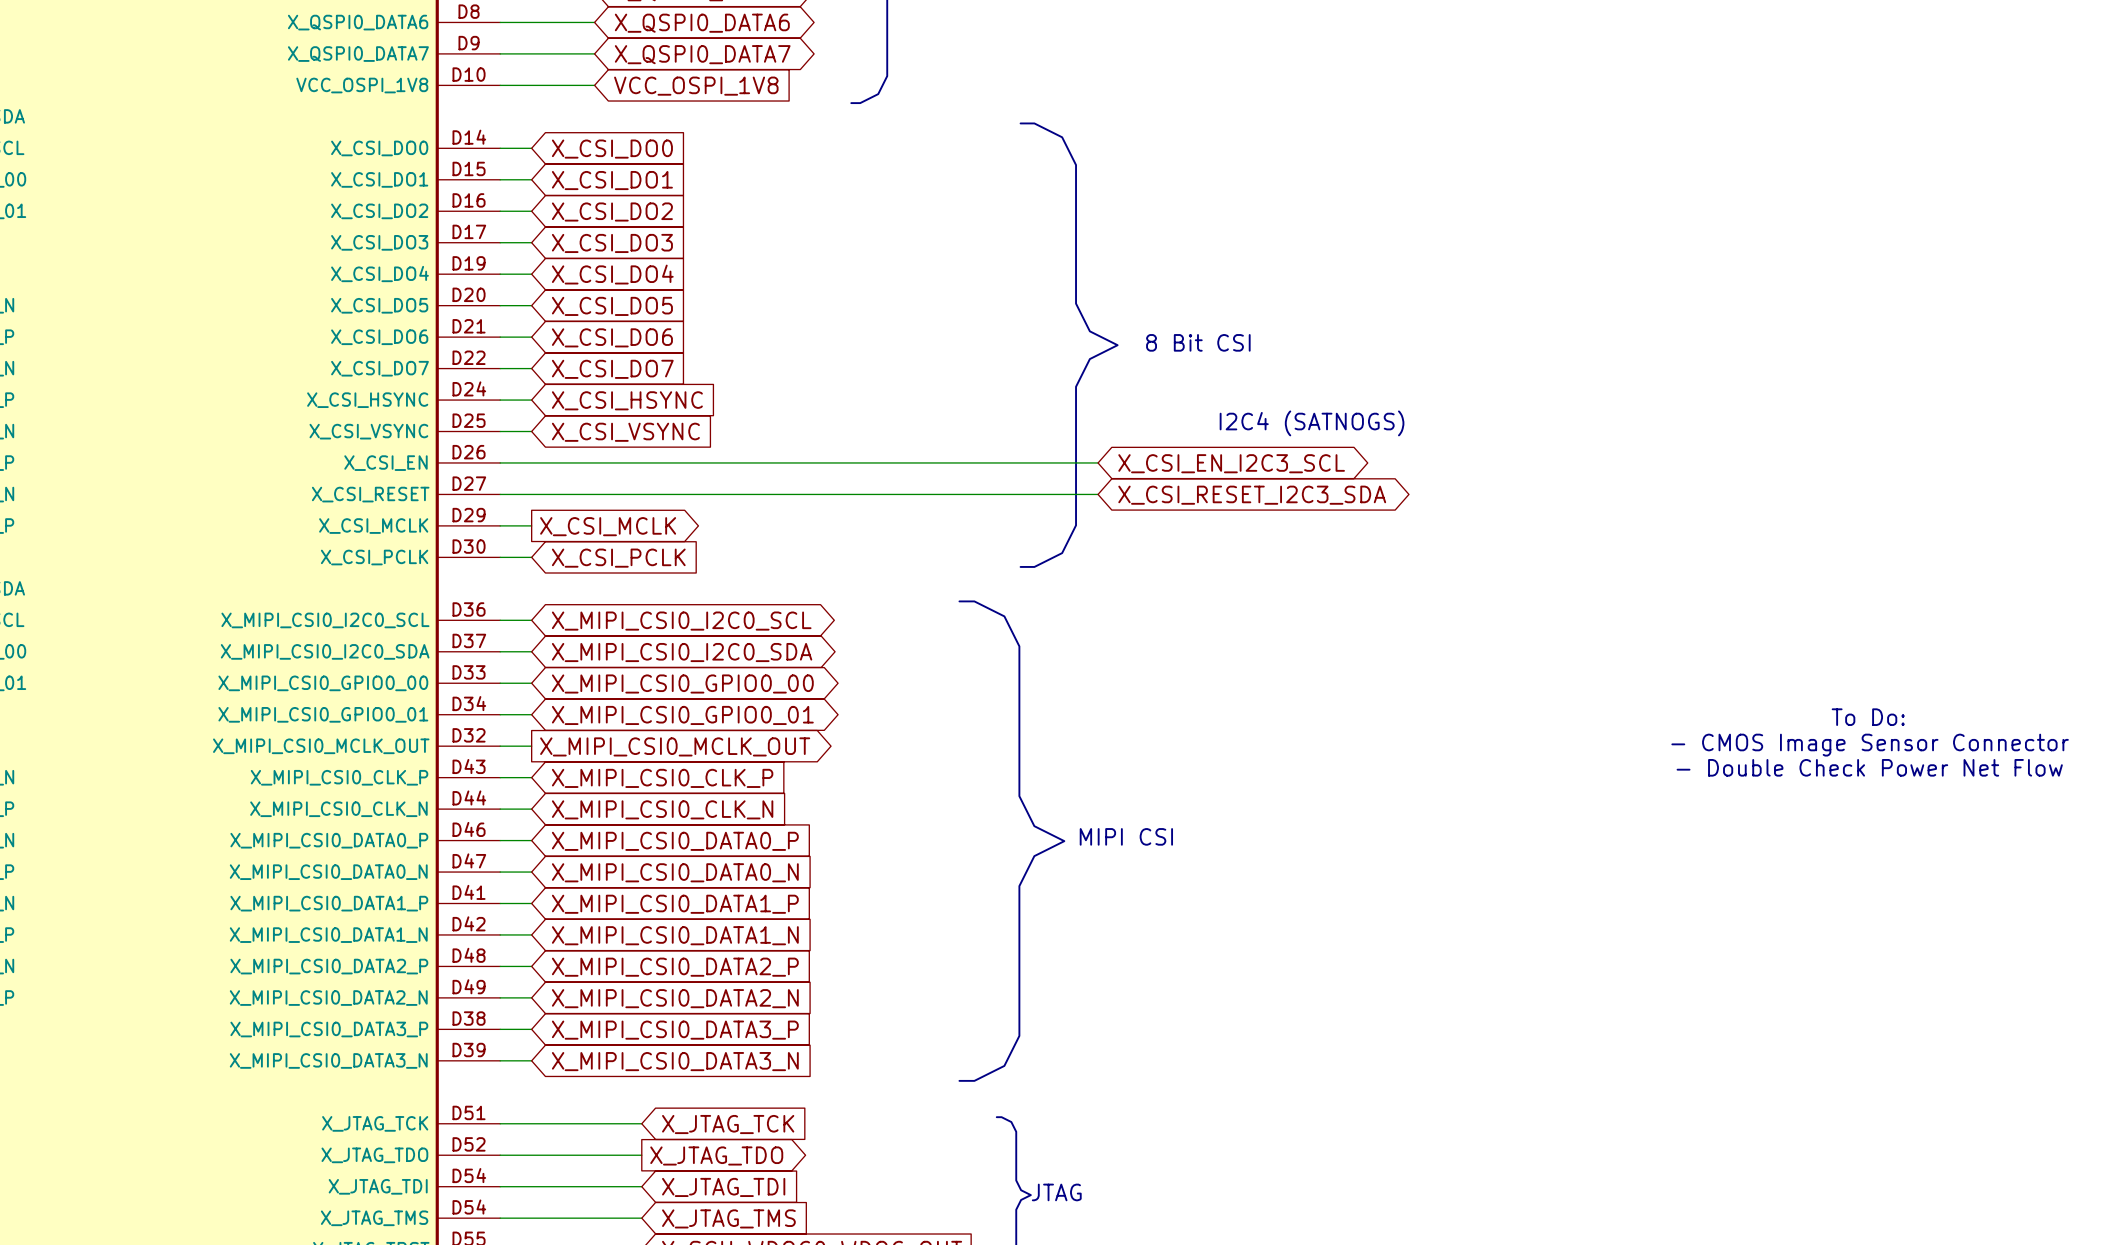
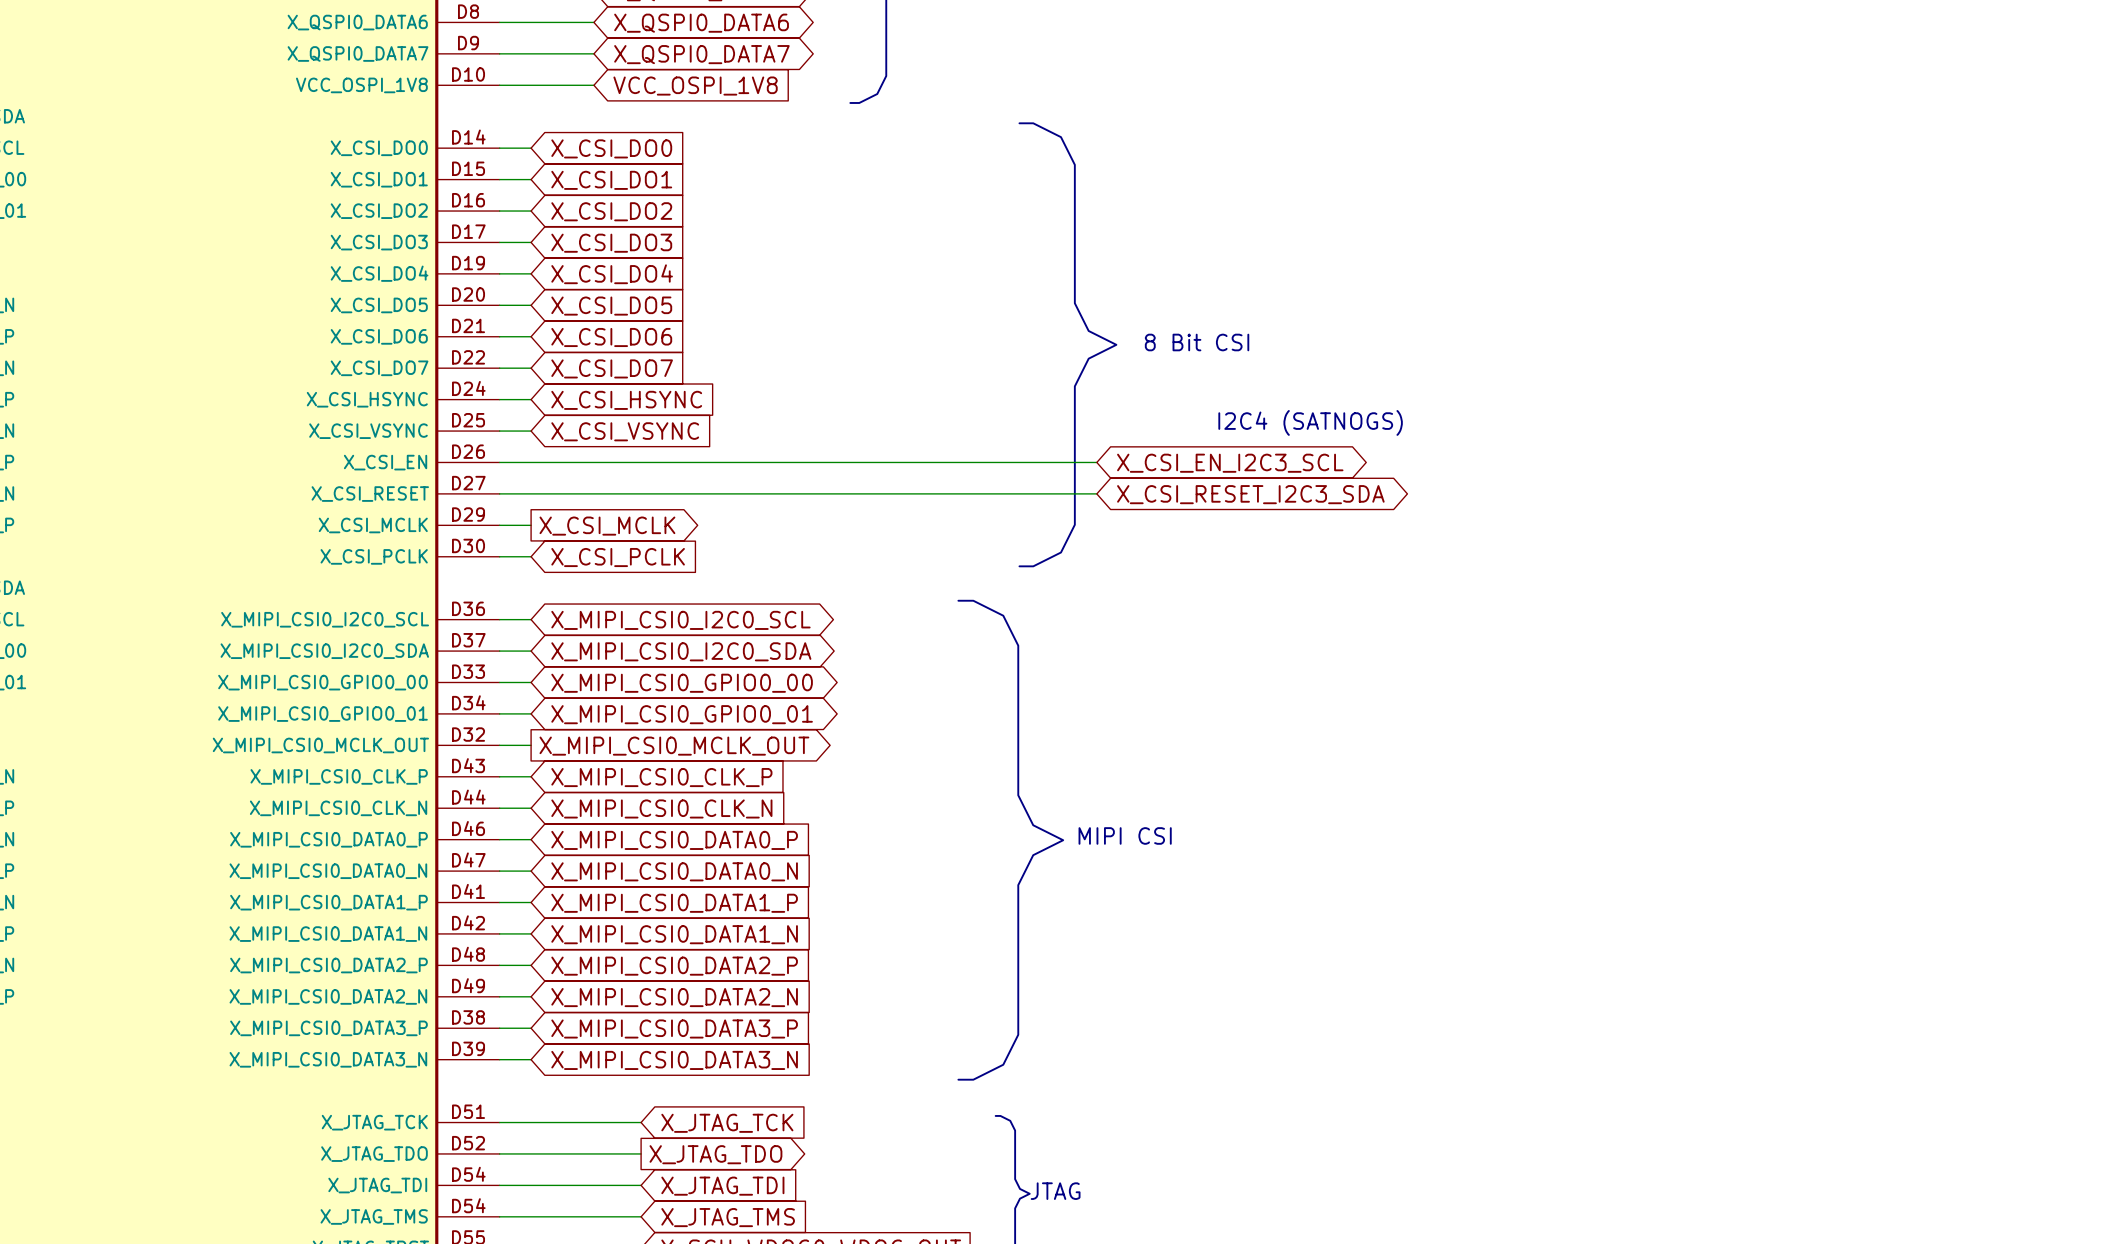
text: To Do: (1868, 717) -> none
text: - CMOS Image Sensor Connector (1870, 745) -> none
text: - Double Check Power Net Flow (1869, 767) -> none

